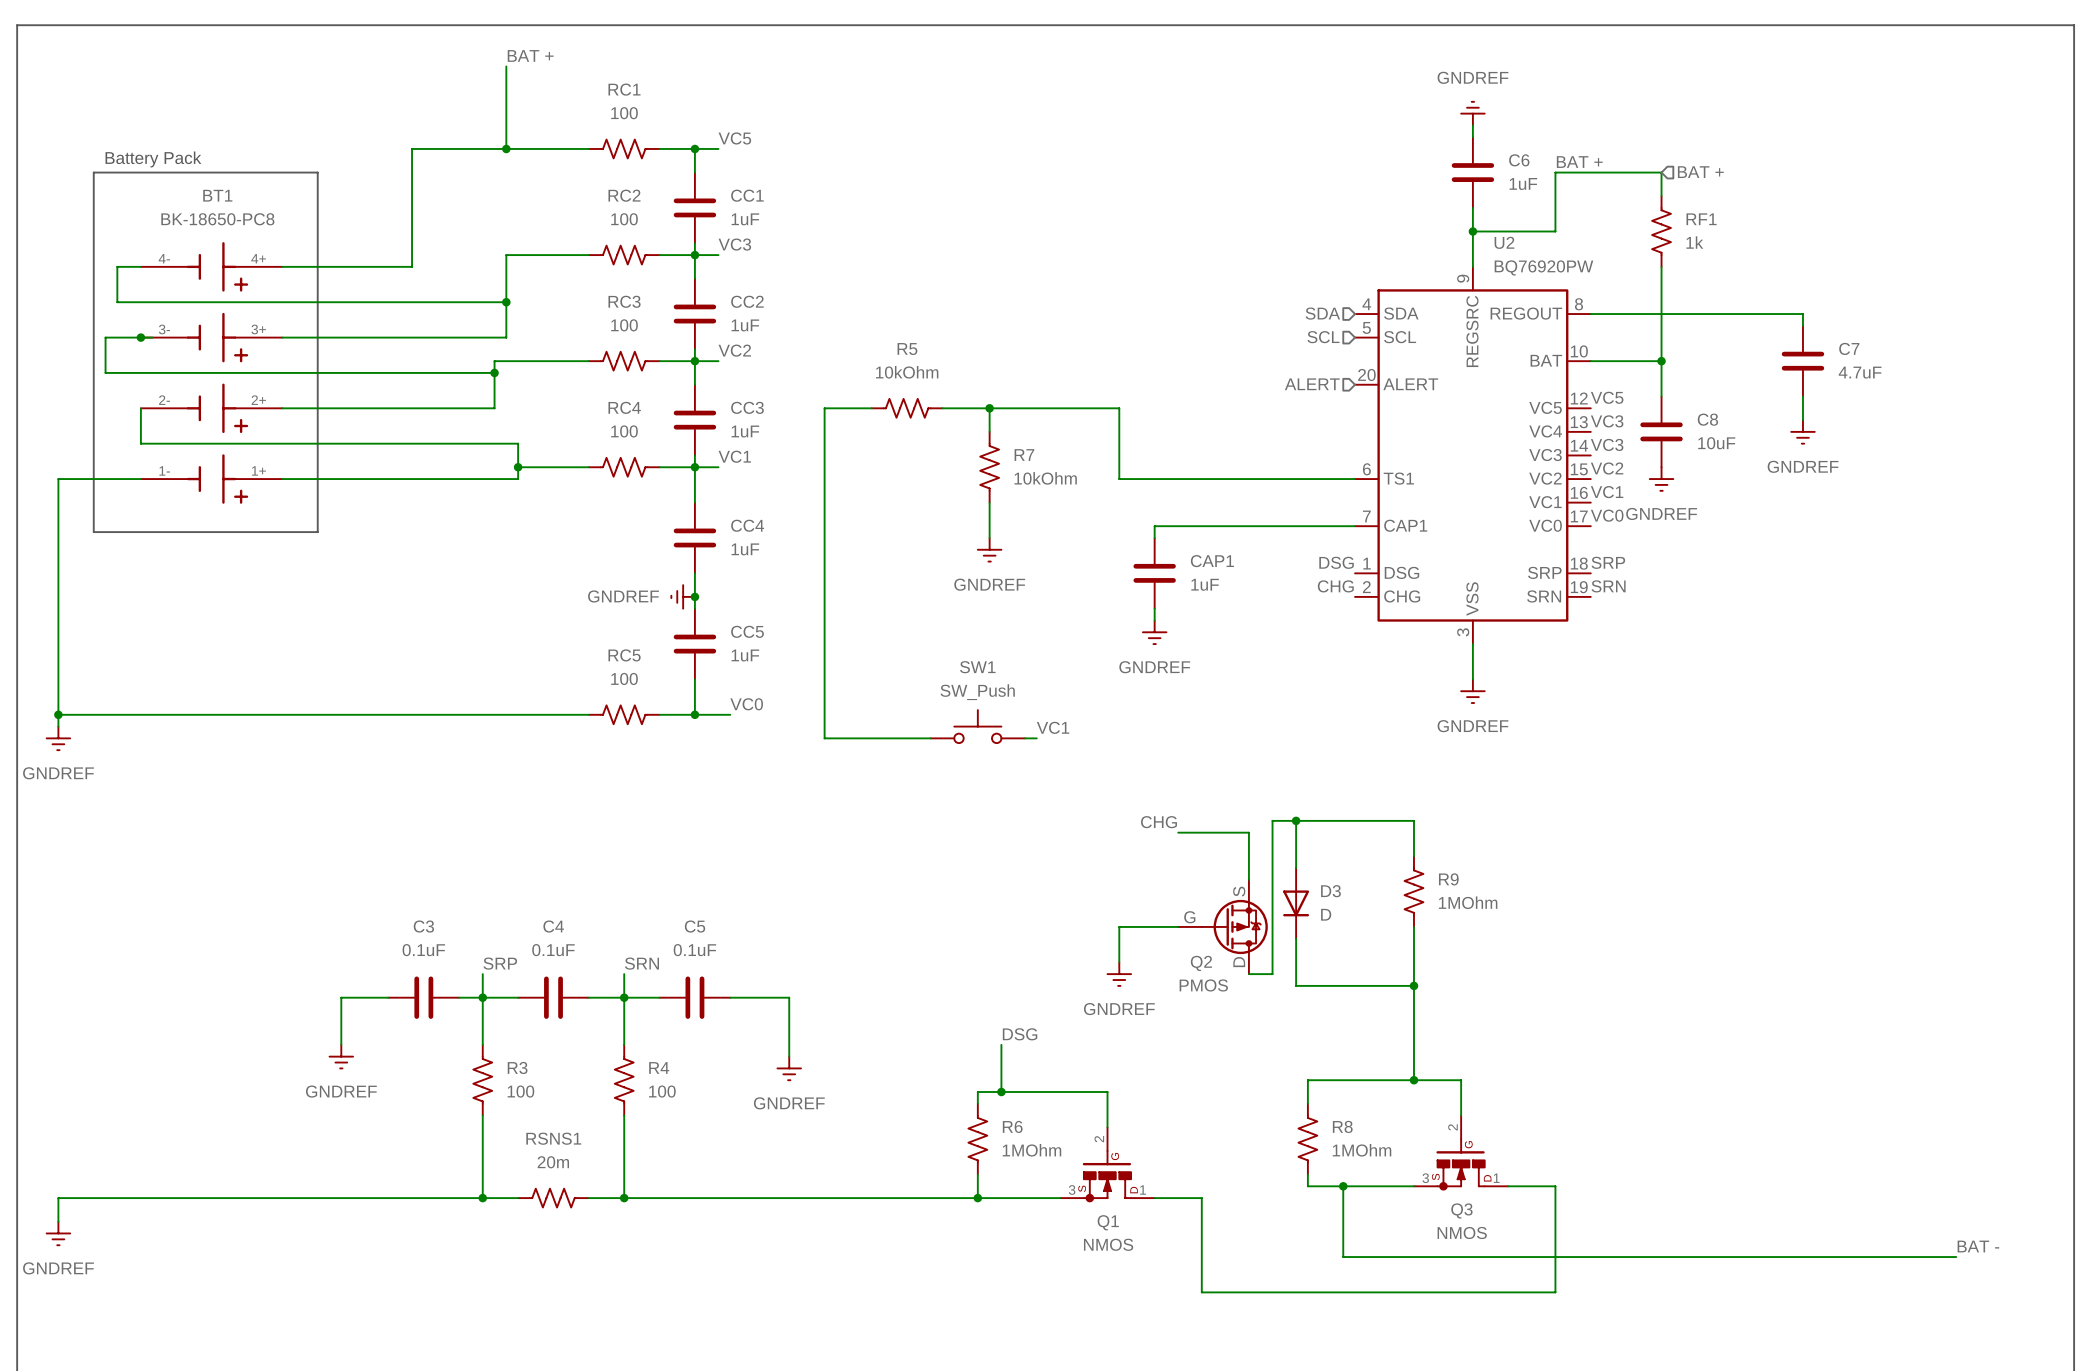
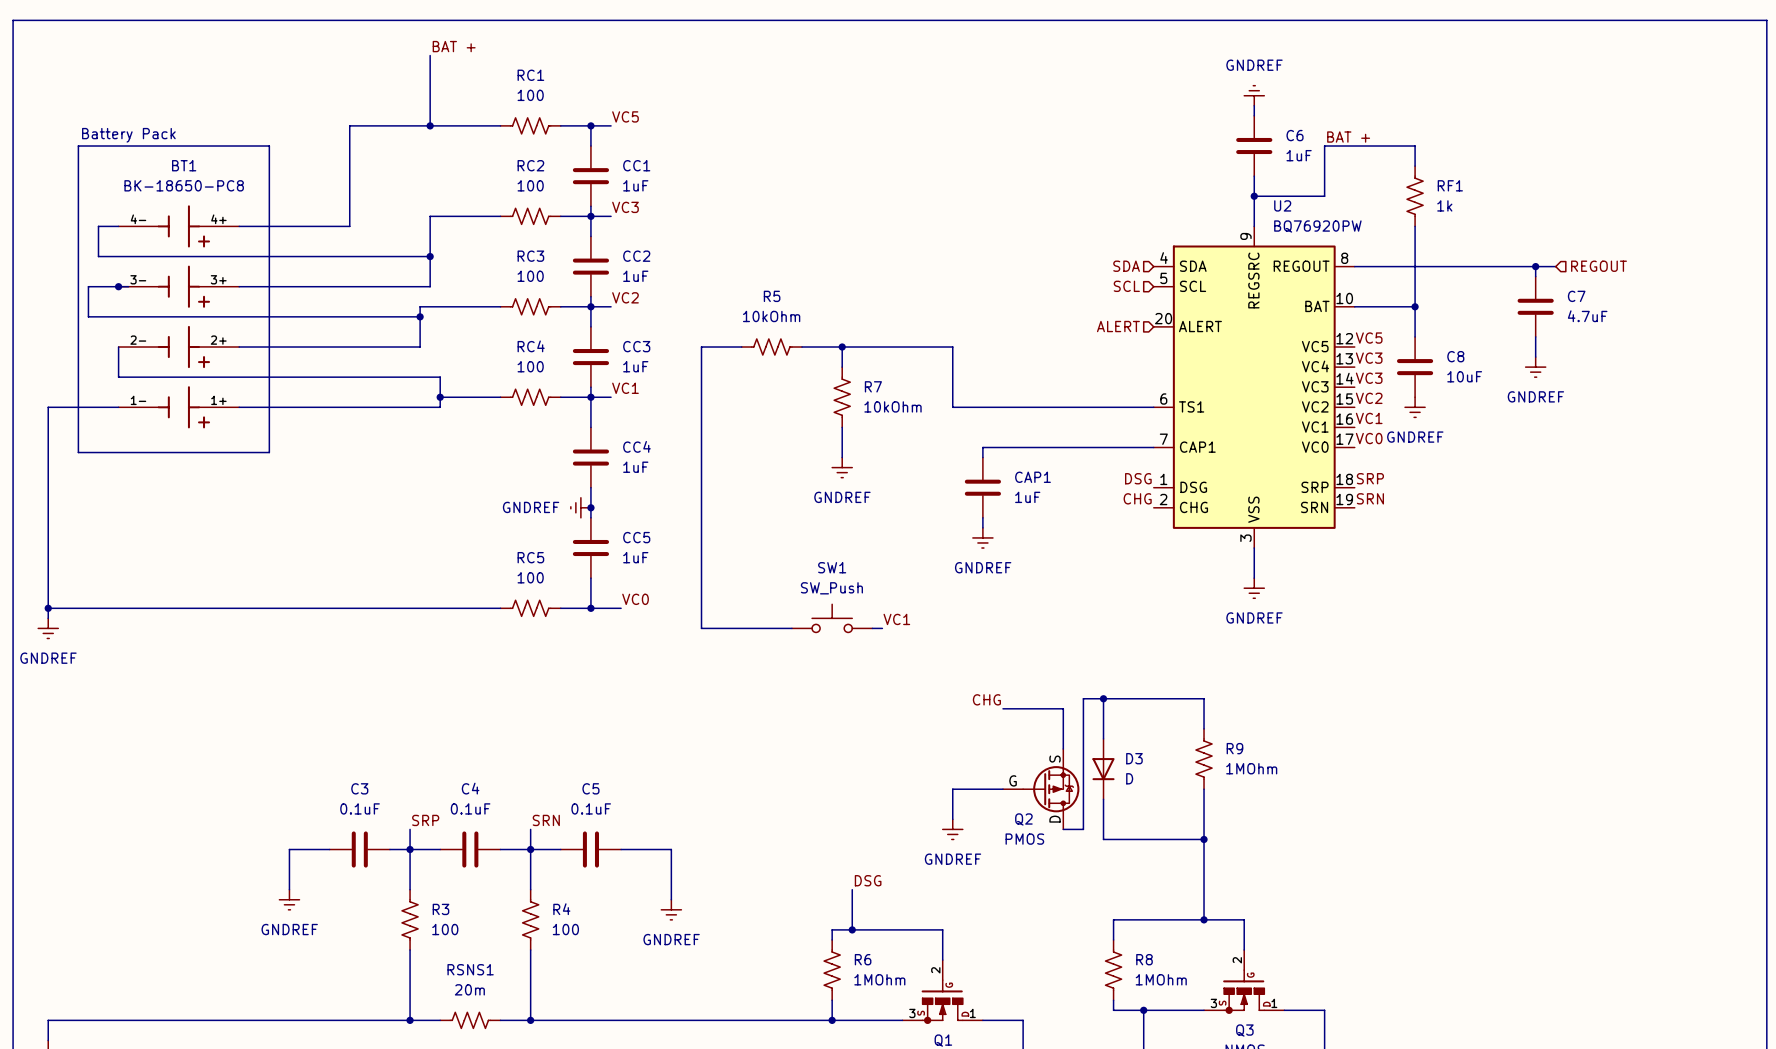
hierarchical label: BAT + (1700, 172) -> none
hierarchical label: none -> REGOUT (1599, 266)
wire: none -> (1535, 266) (1555, 266)
junction: none -> (1535, 266)

